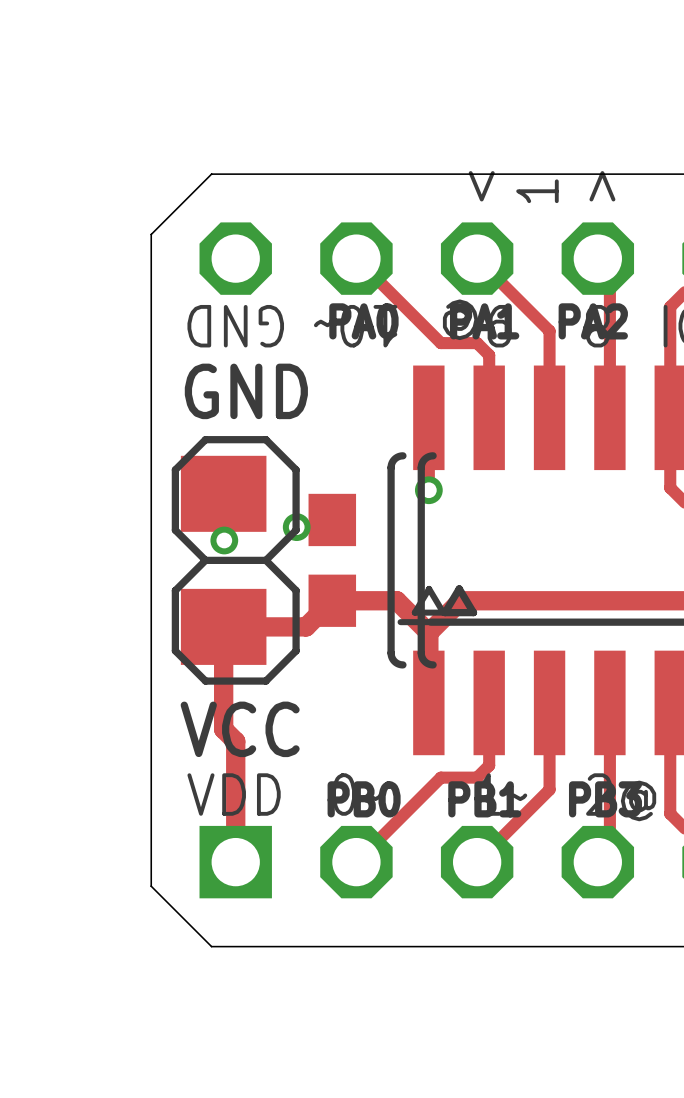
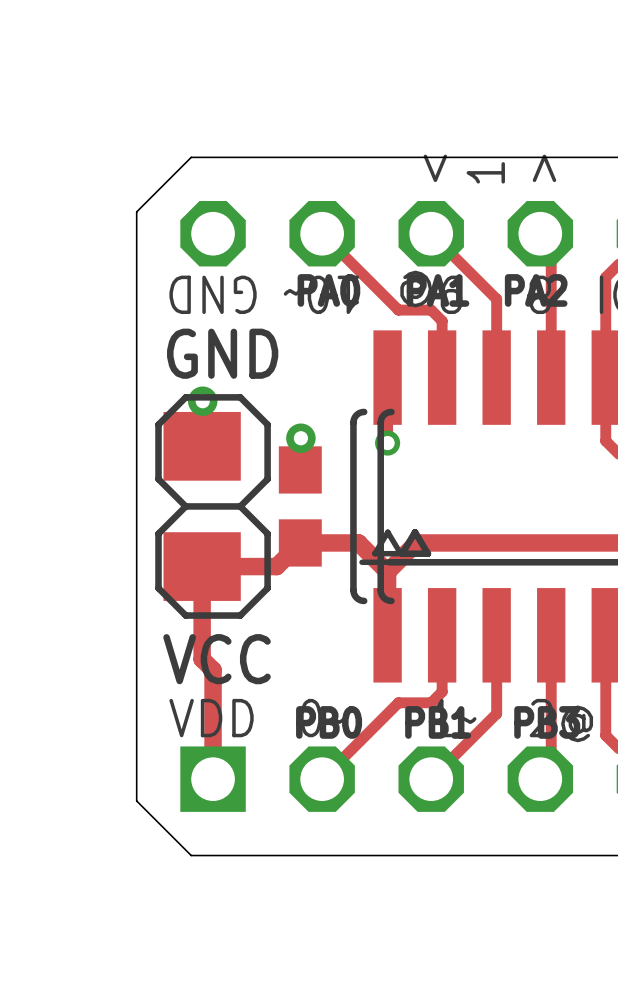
via: none -> (202, 401)
via: none -> (300, 438)
via: (296, 527) -> none
via: (224, 540) -> none

